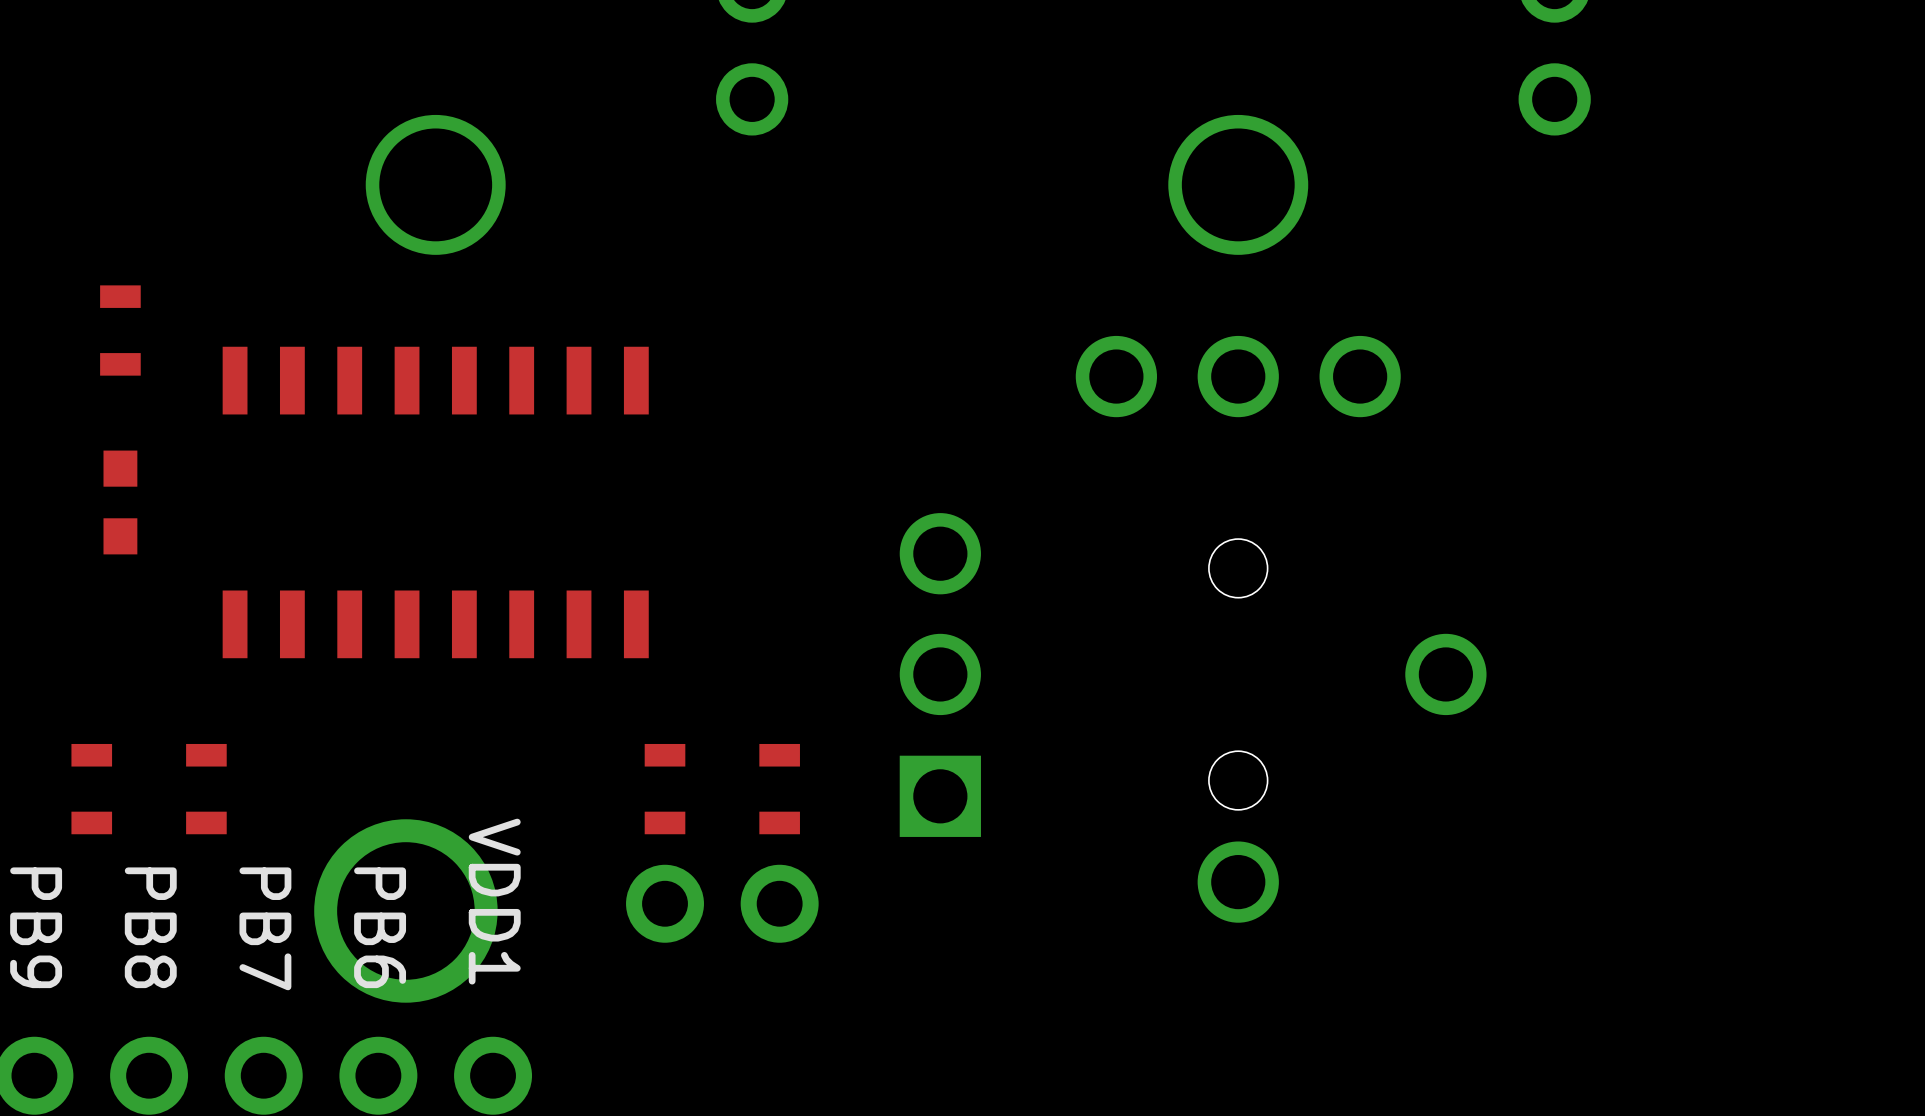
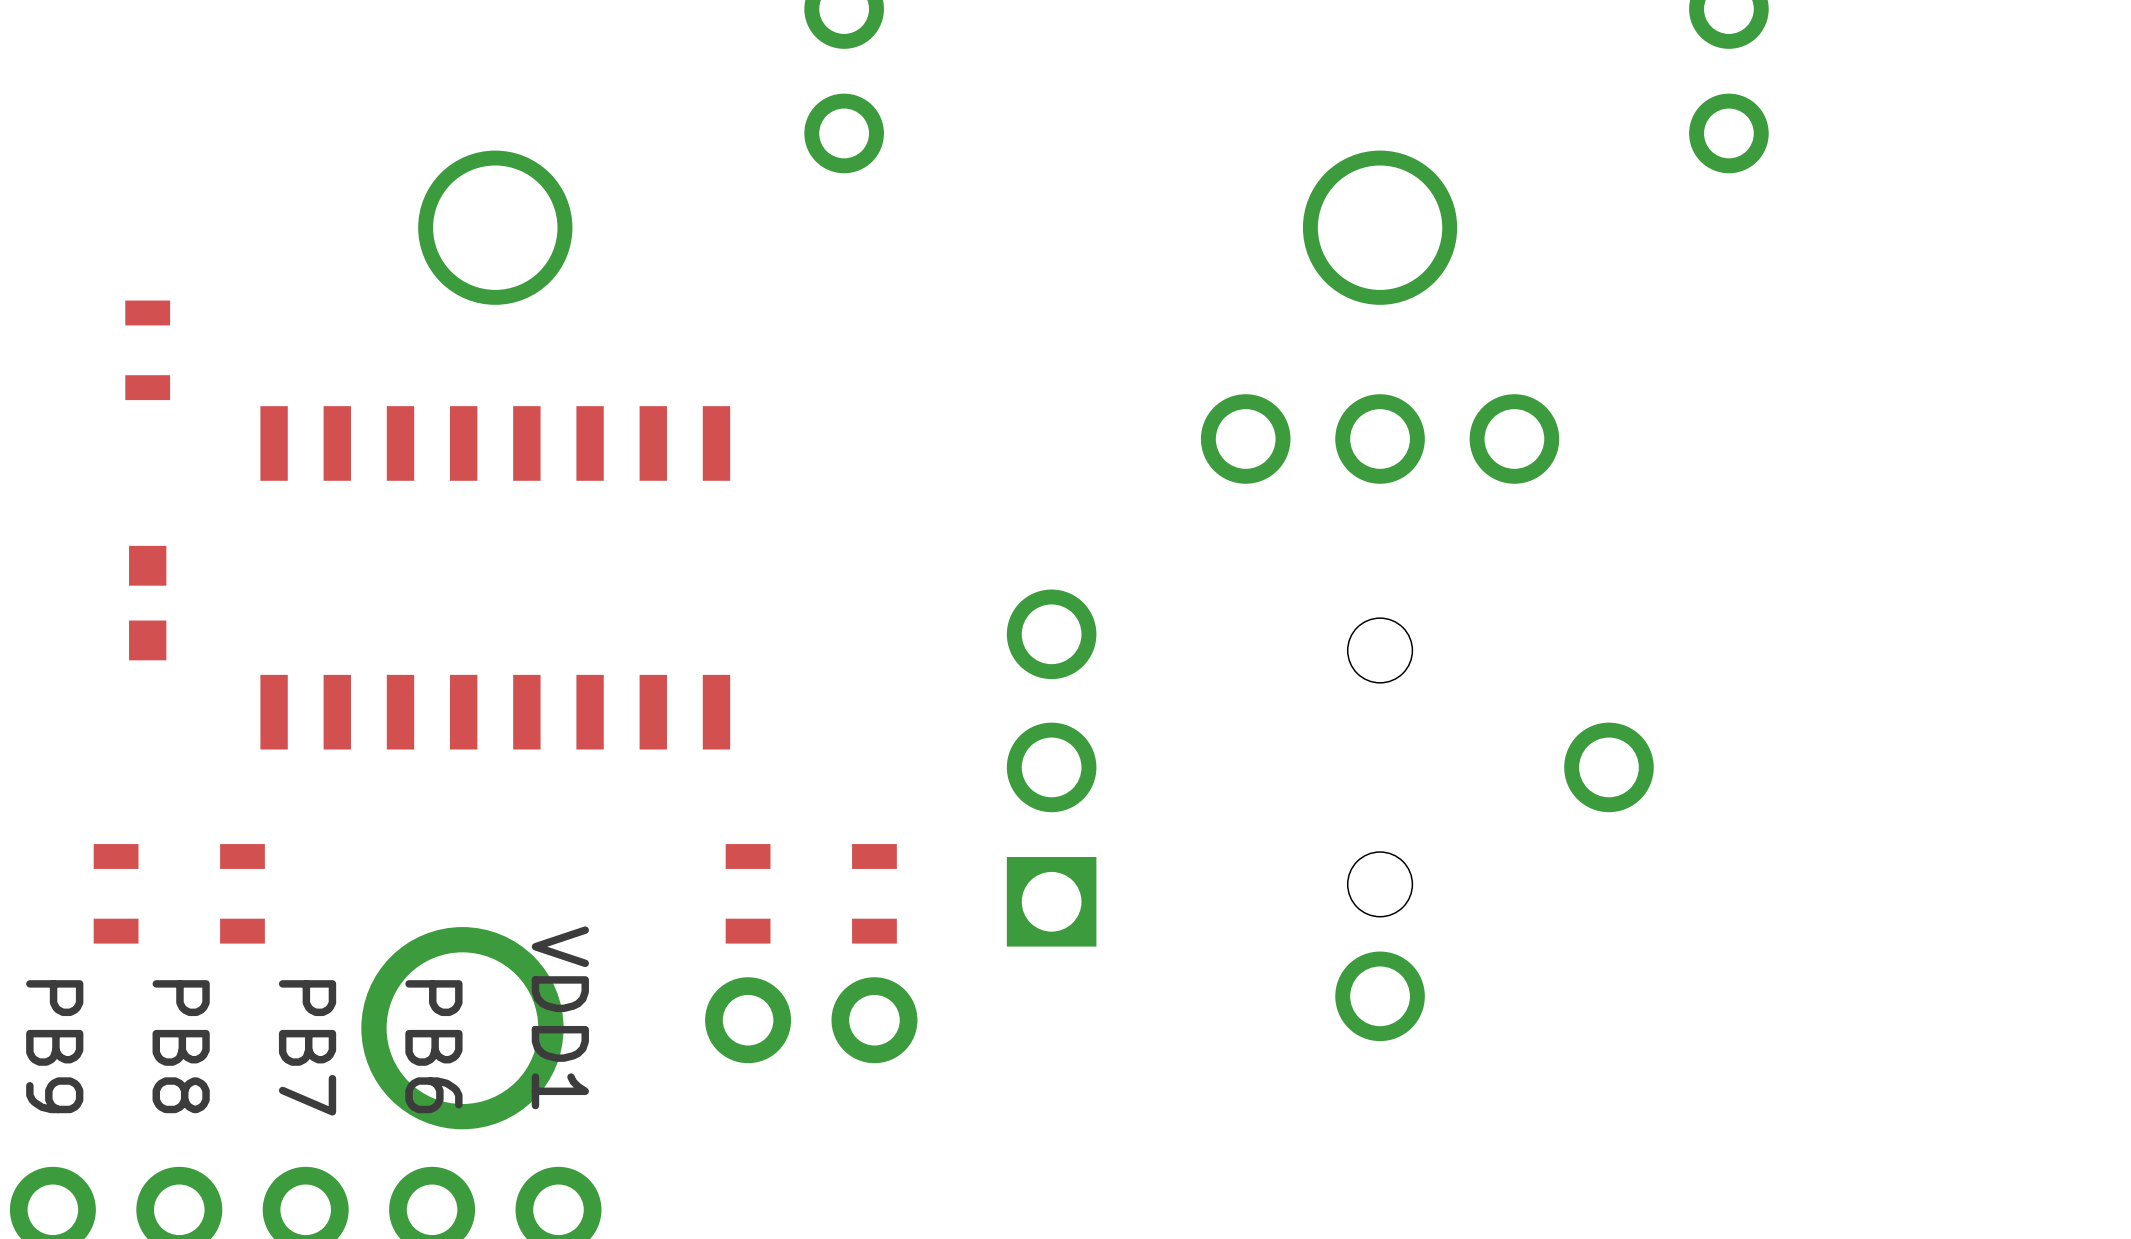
part position: (120, 330) -> (147, 350)
part position: (120, 502) -> (147, 603)

